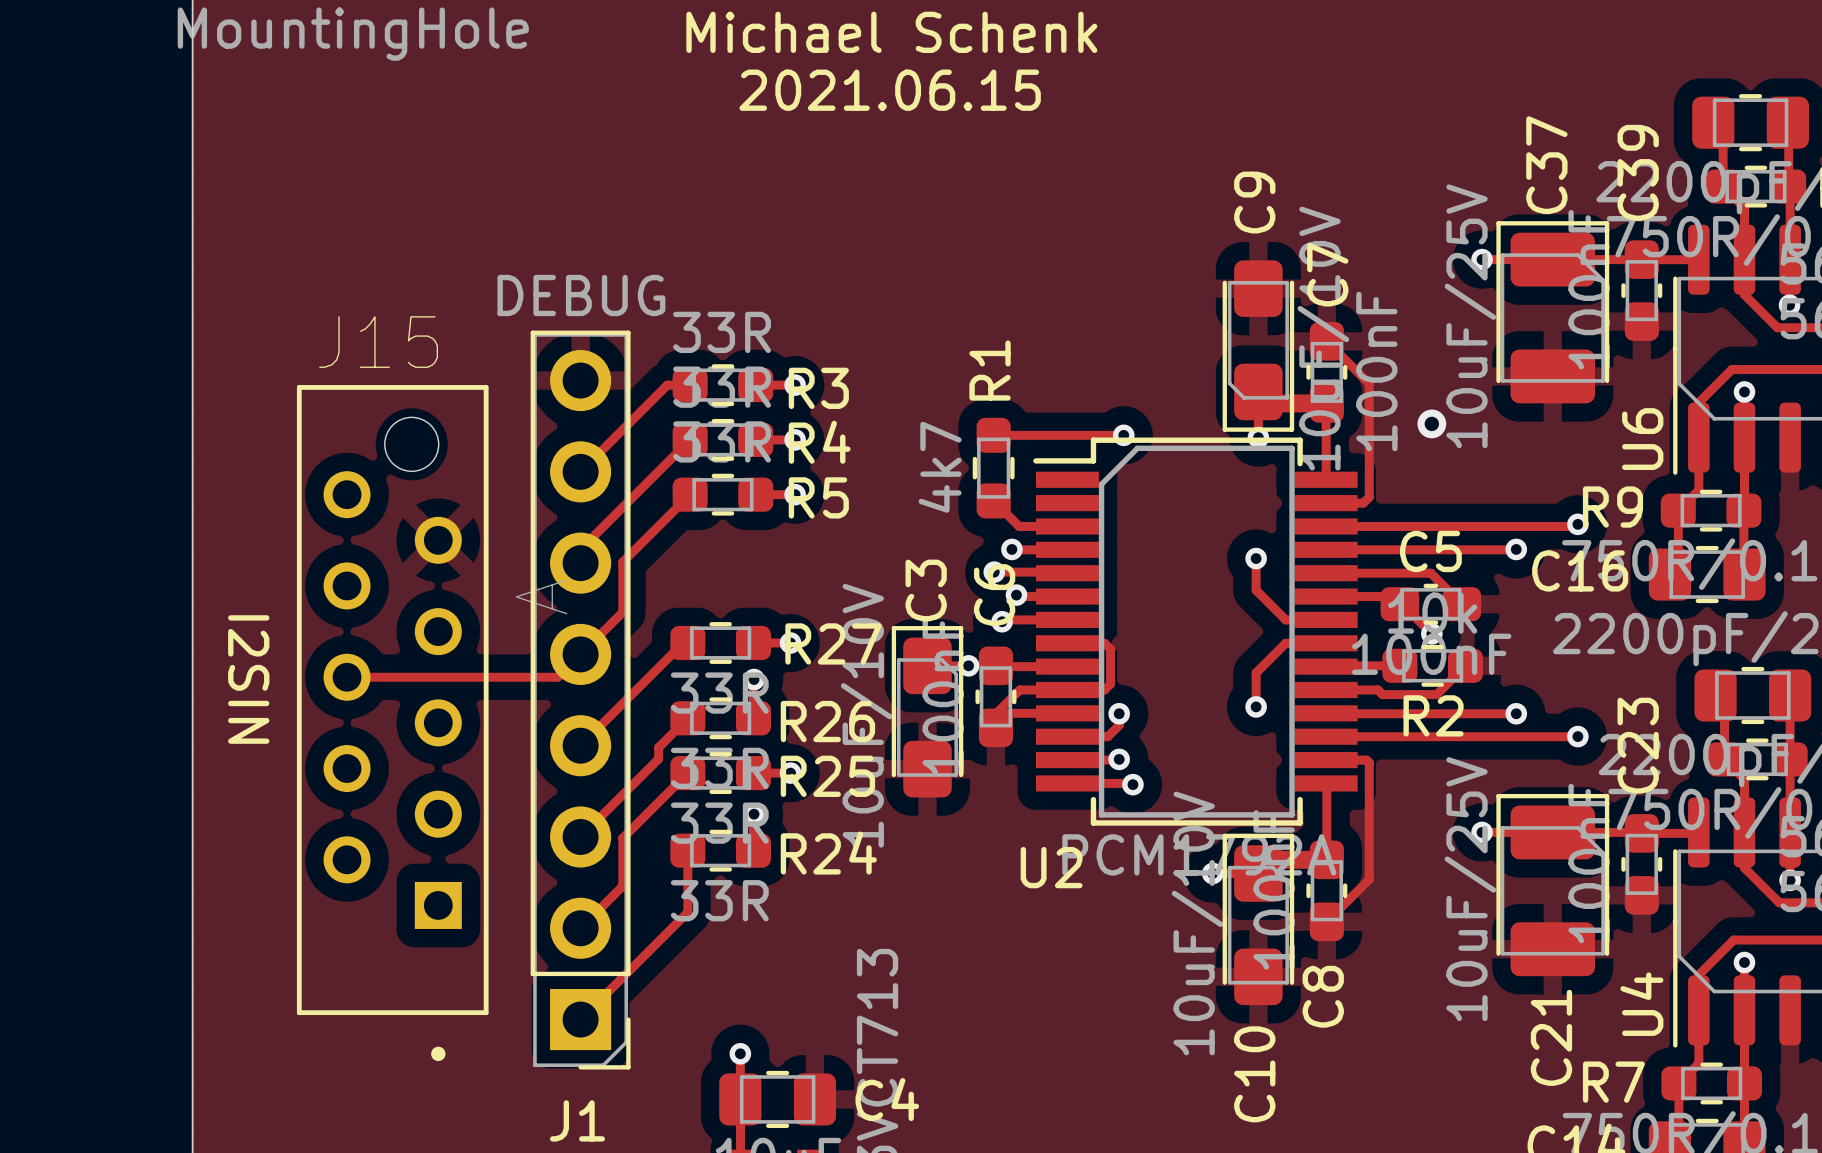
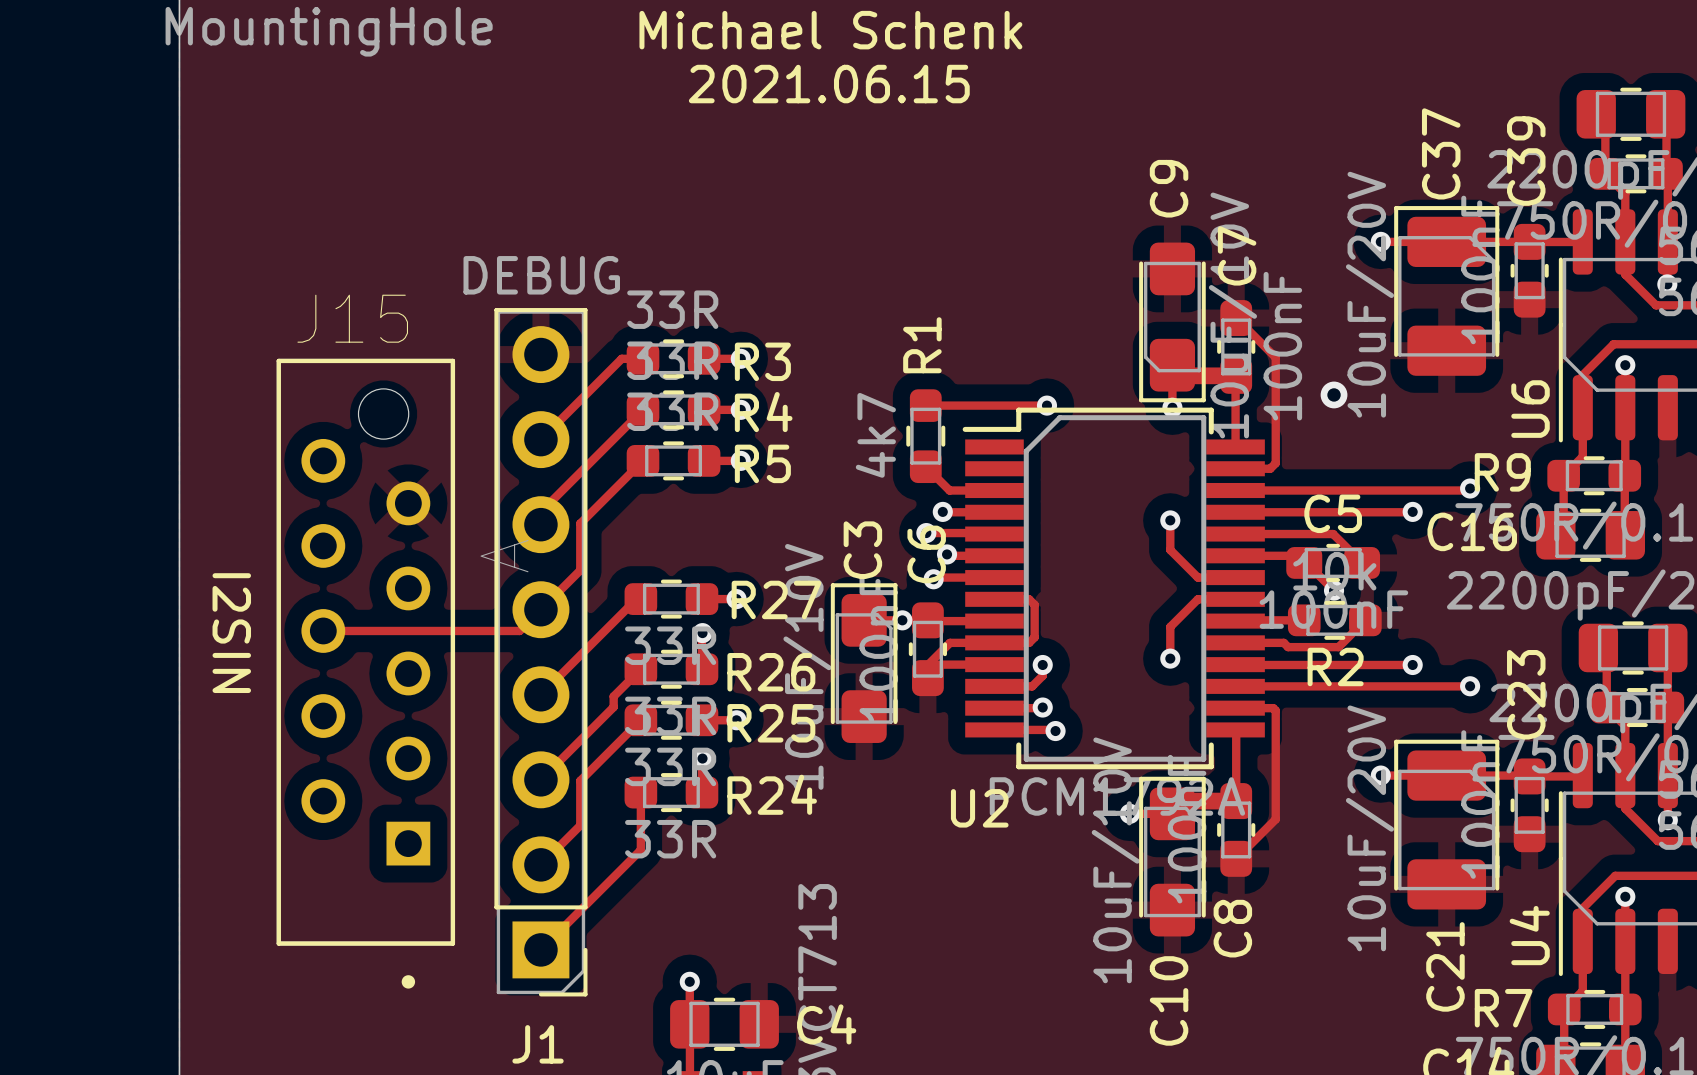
C37 value: 10uF/25V (1470, 316) -> 10uF/20V (1369, 294)
C21 value: 10uF/25V (1470, 889) -> 10uF/20V (1369, 828)

